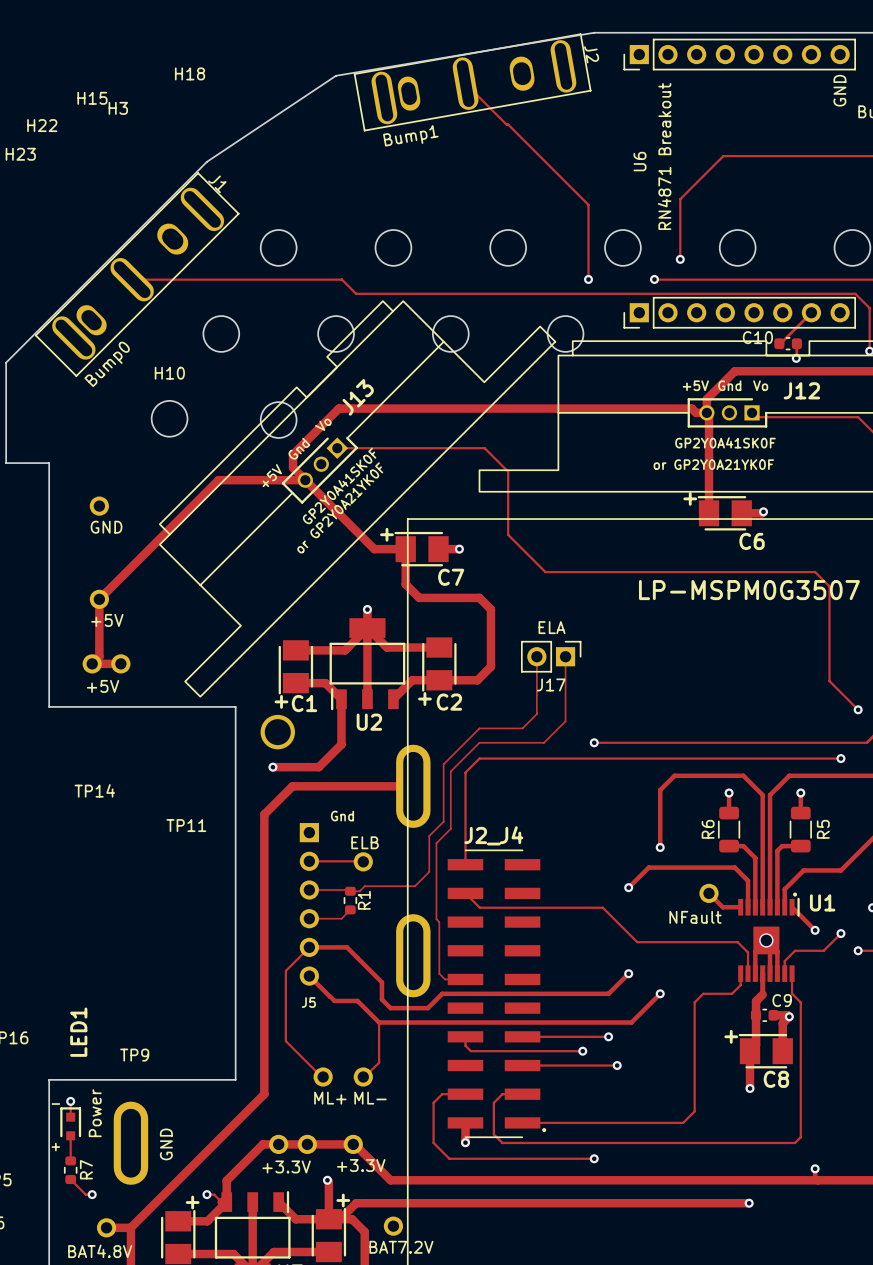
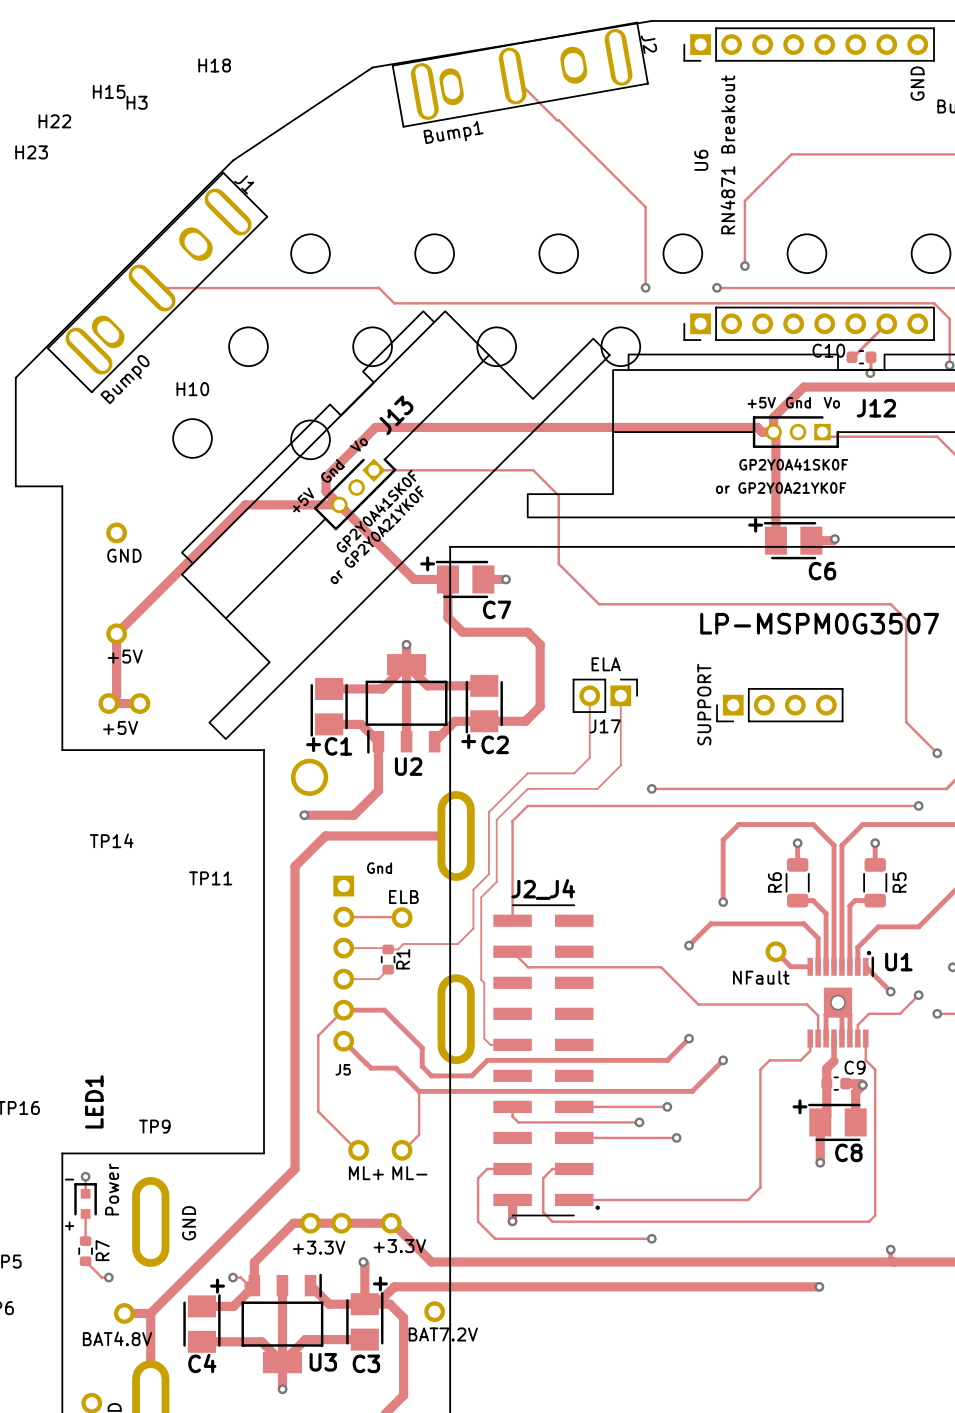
SUPPORT: none -> (779, 705)

